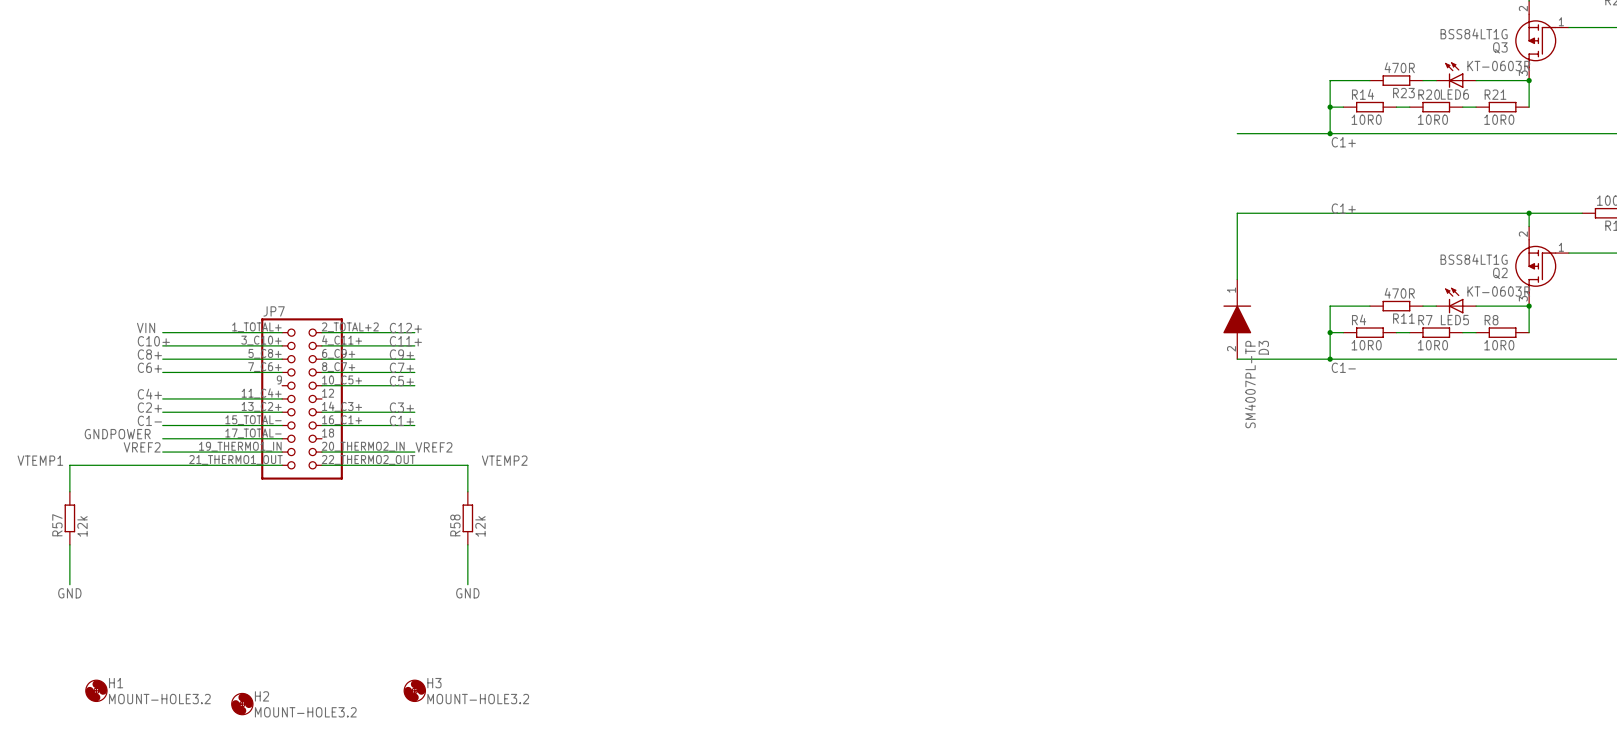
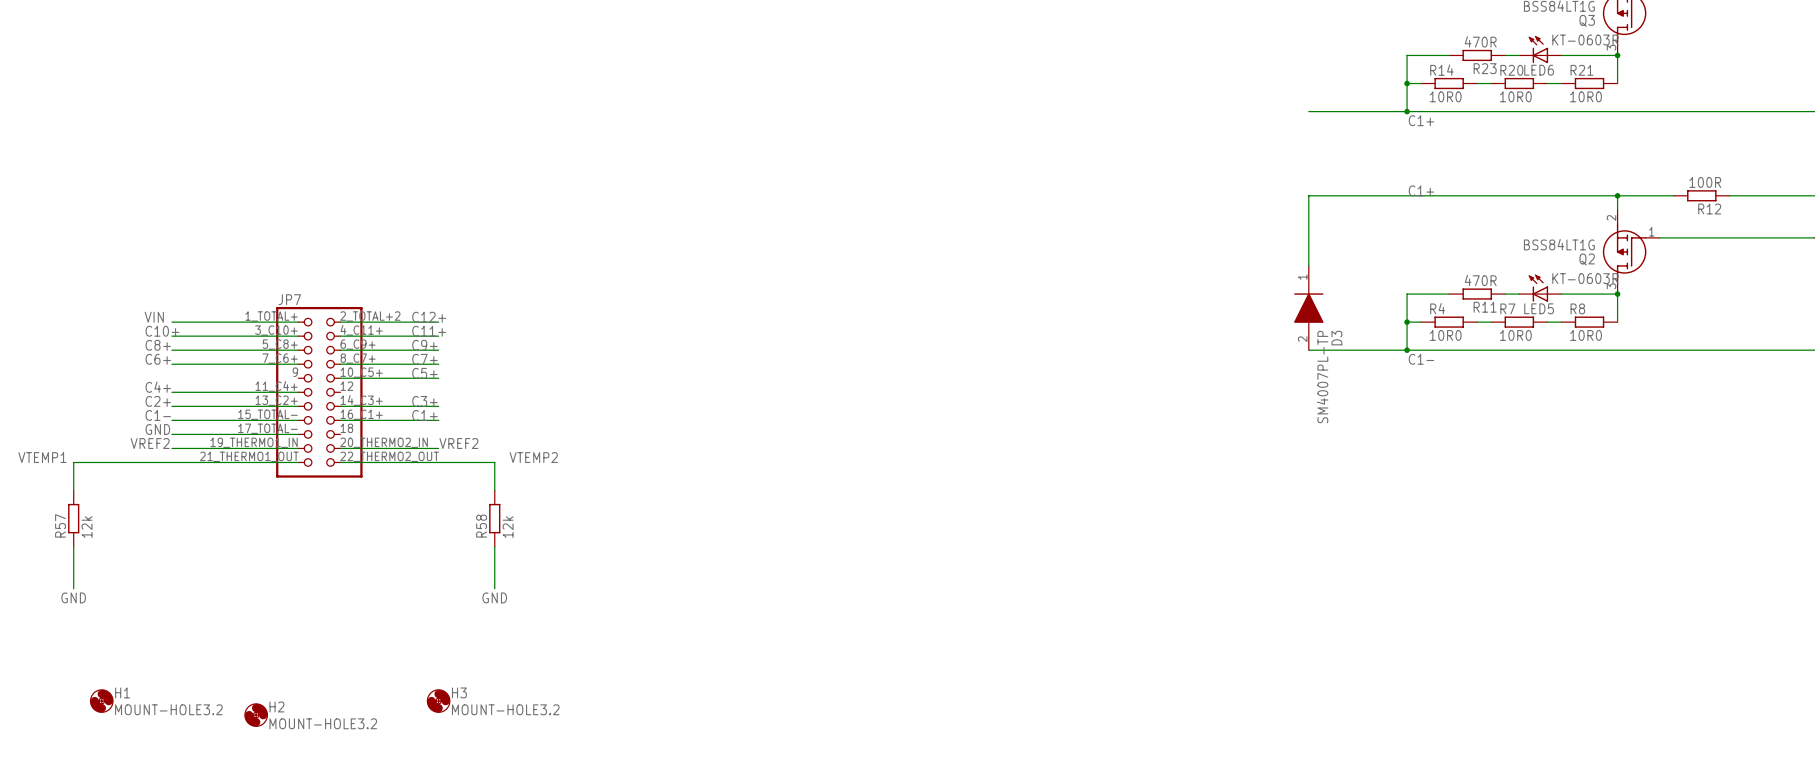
label: GNDPOWER (117, 434) -> none
label: none -> GND (157, 429)

